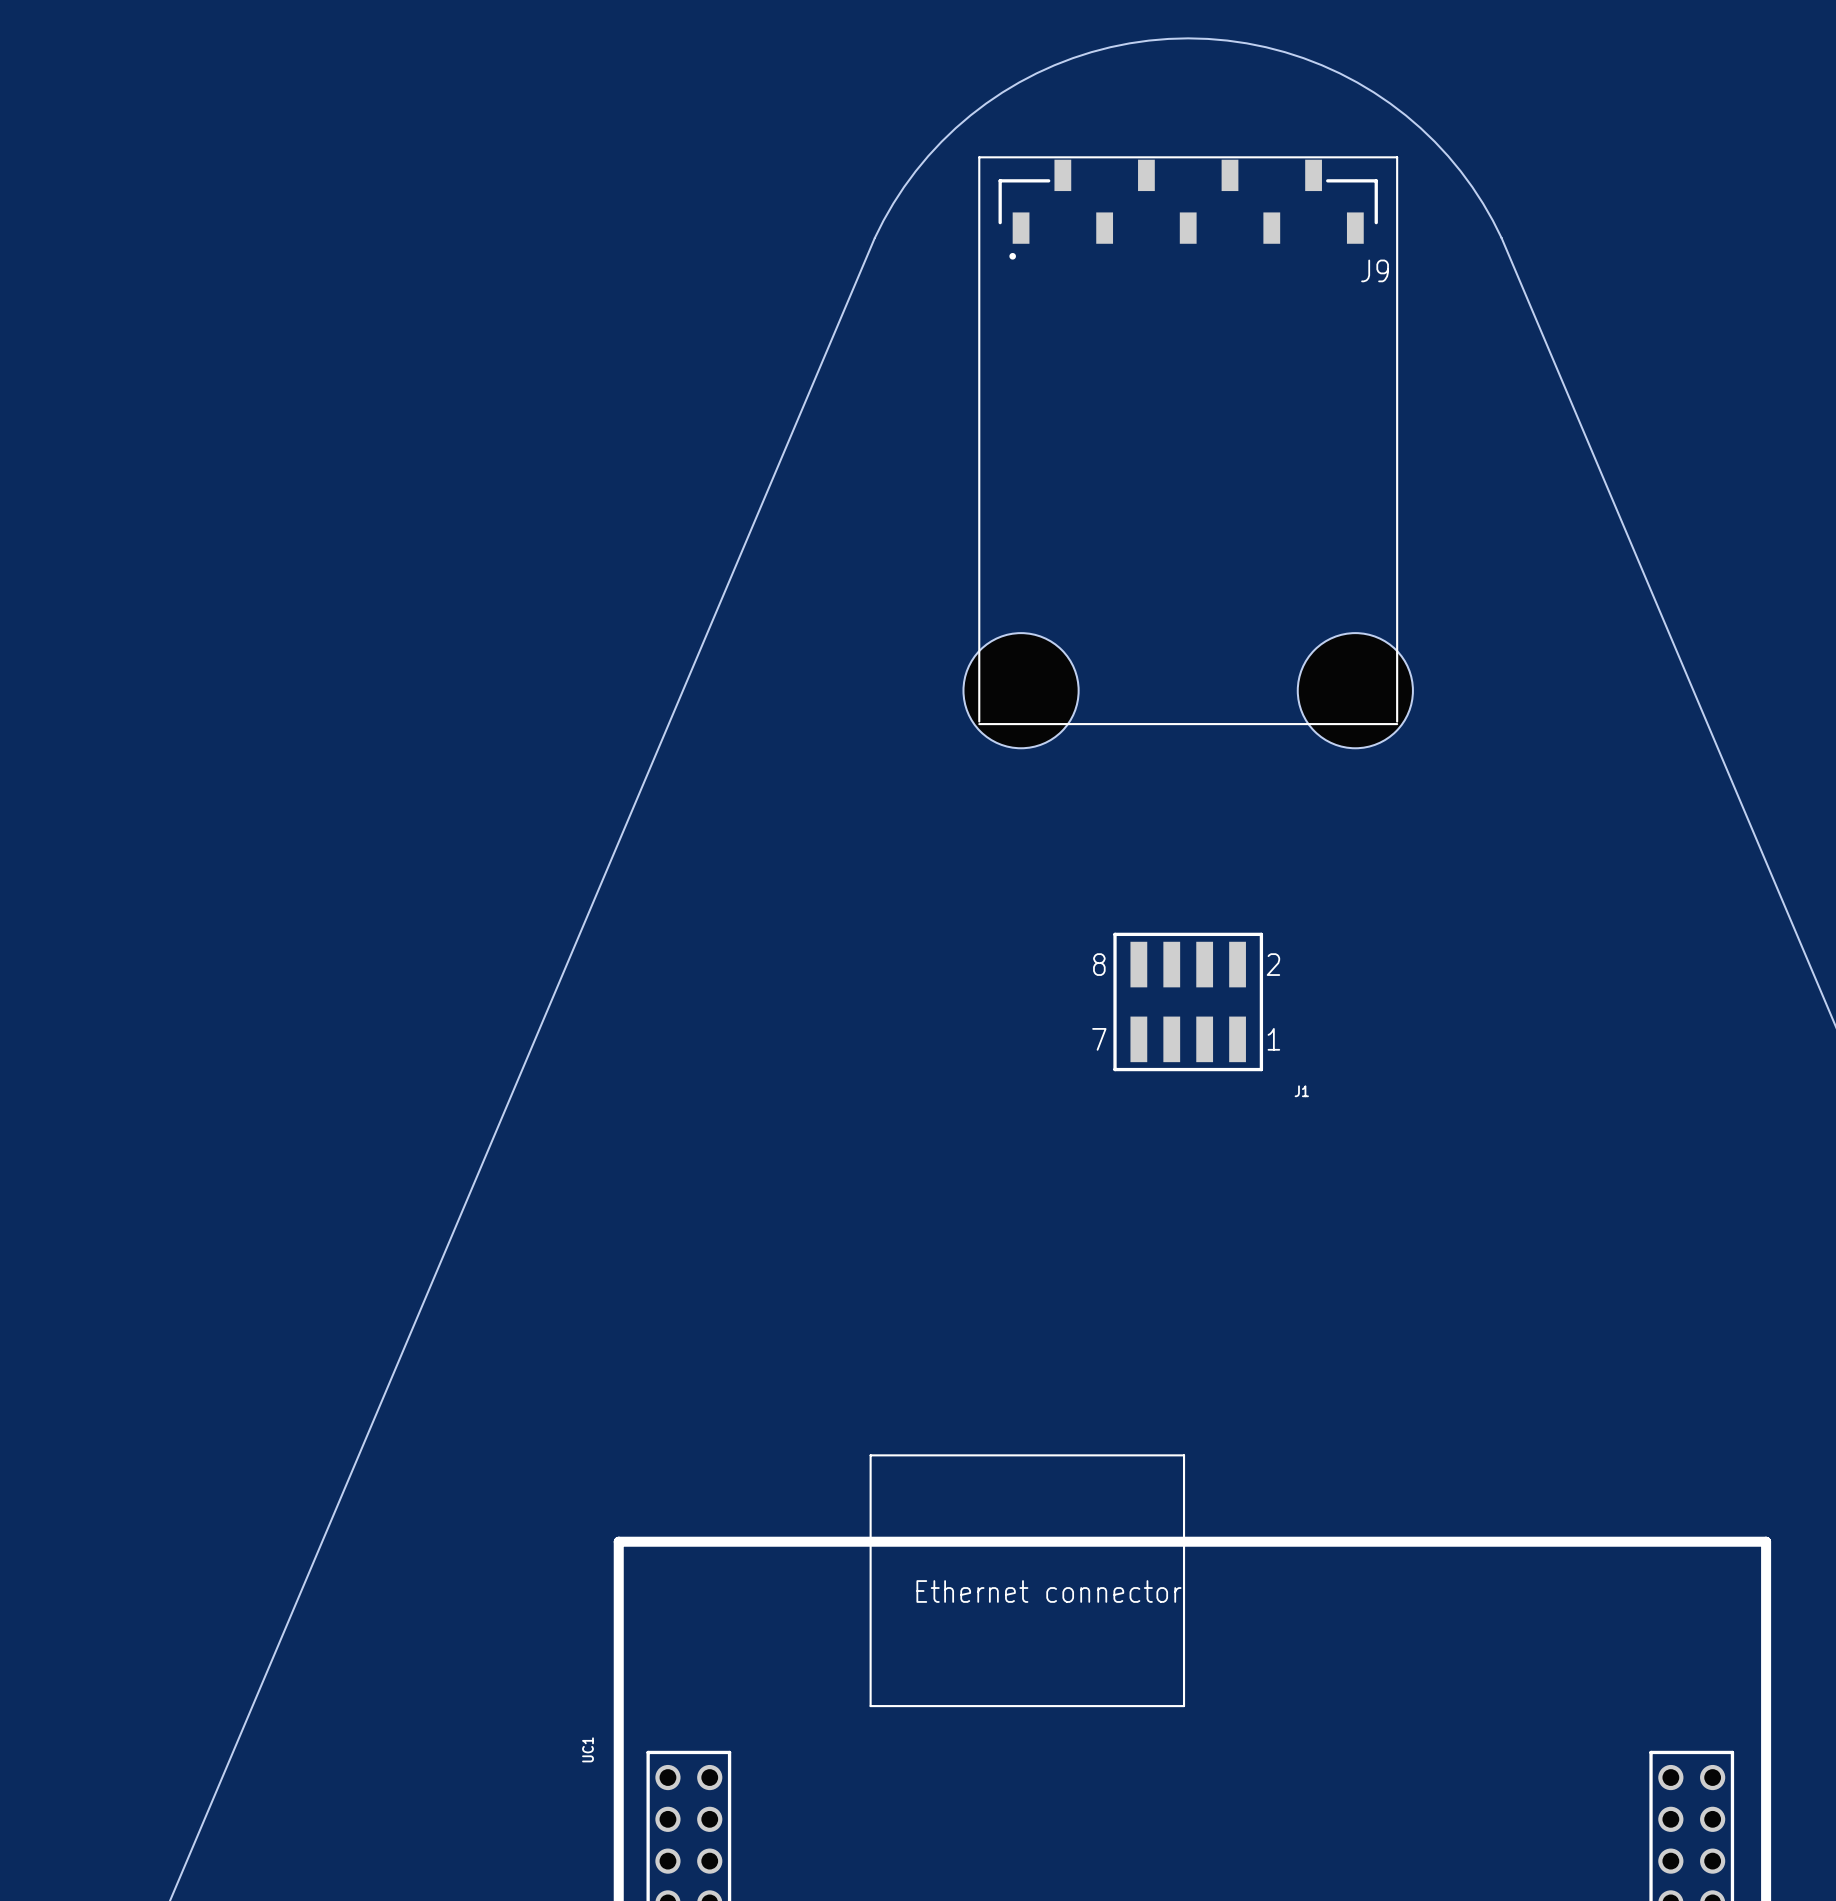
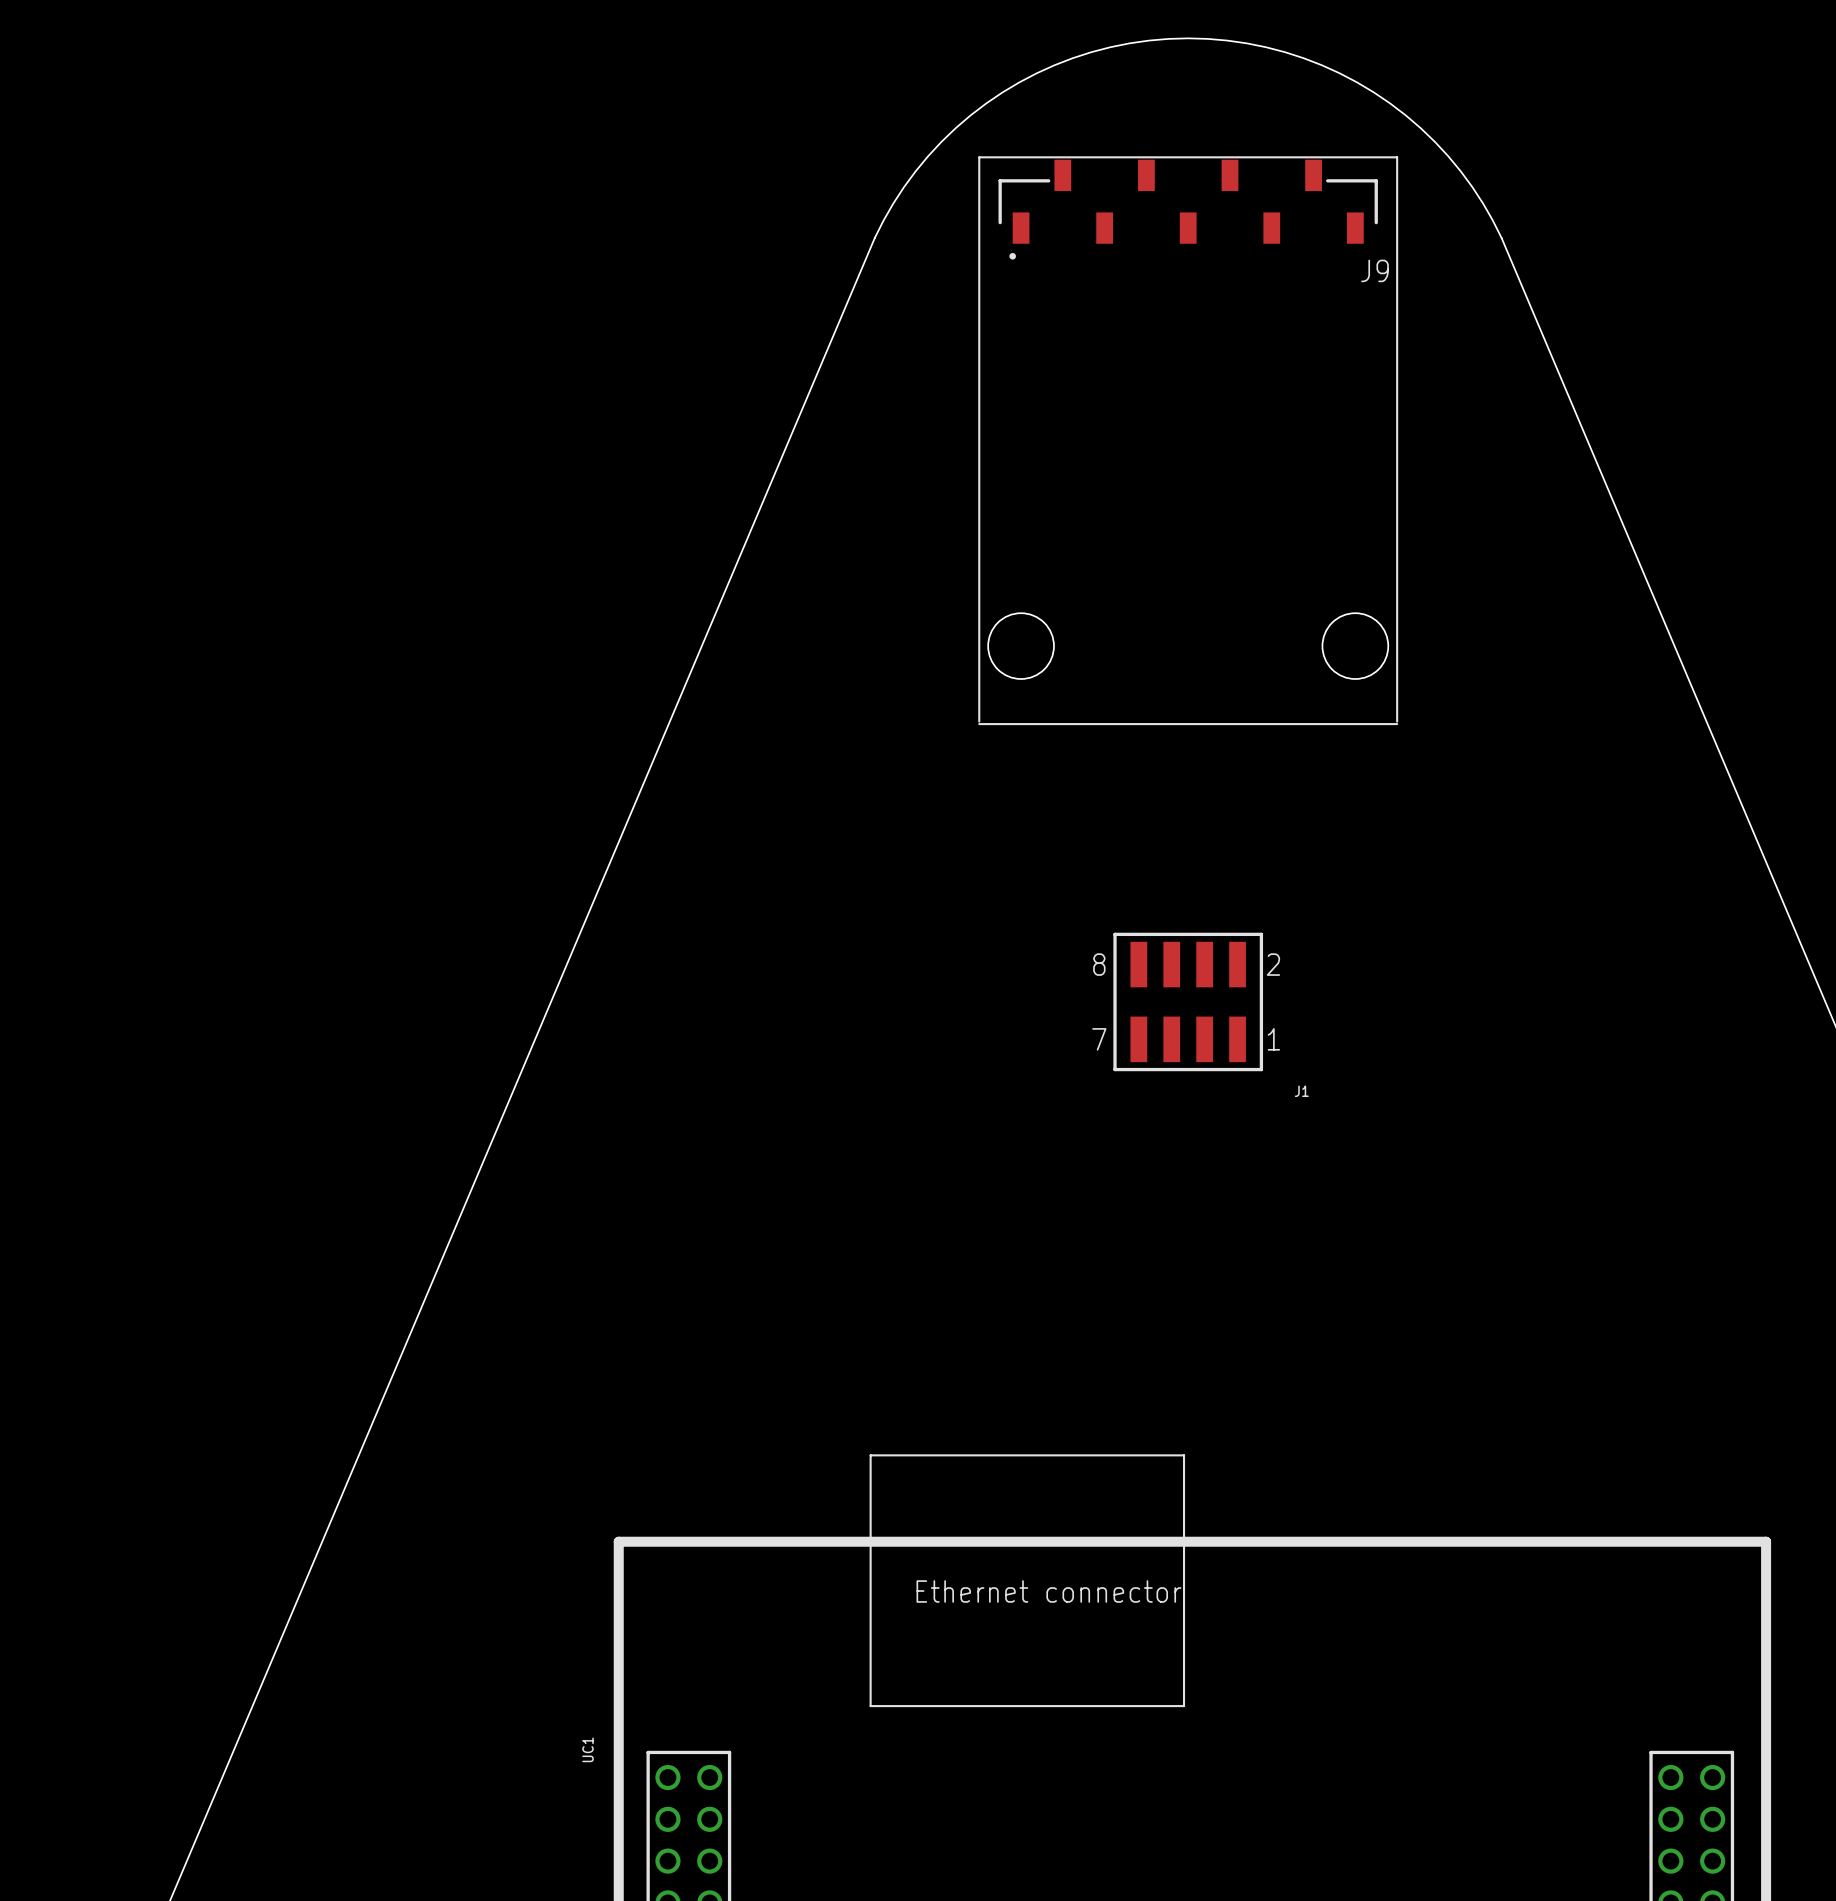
J9 footprint: [963, 156, 1413, 749] -> [978, 156, 1399, 726]

